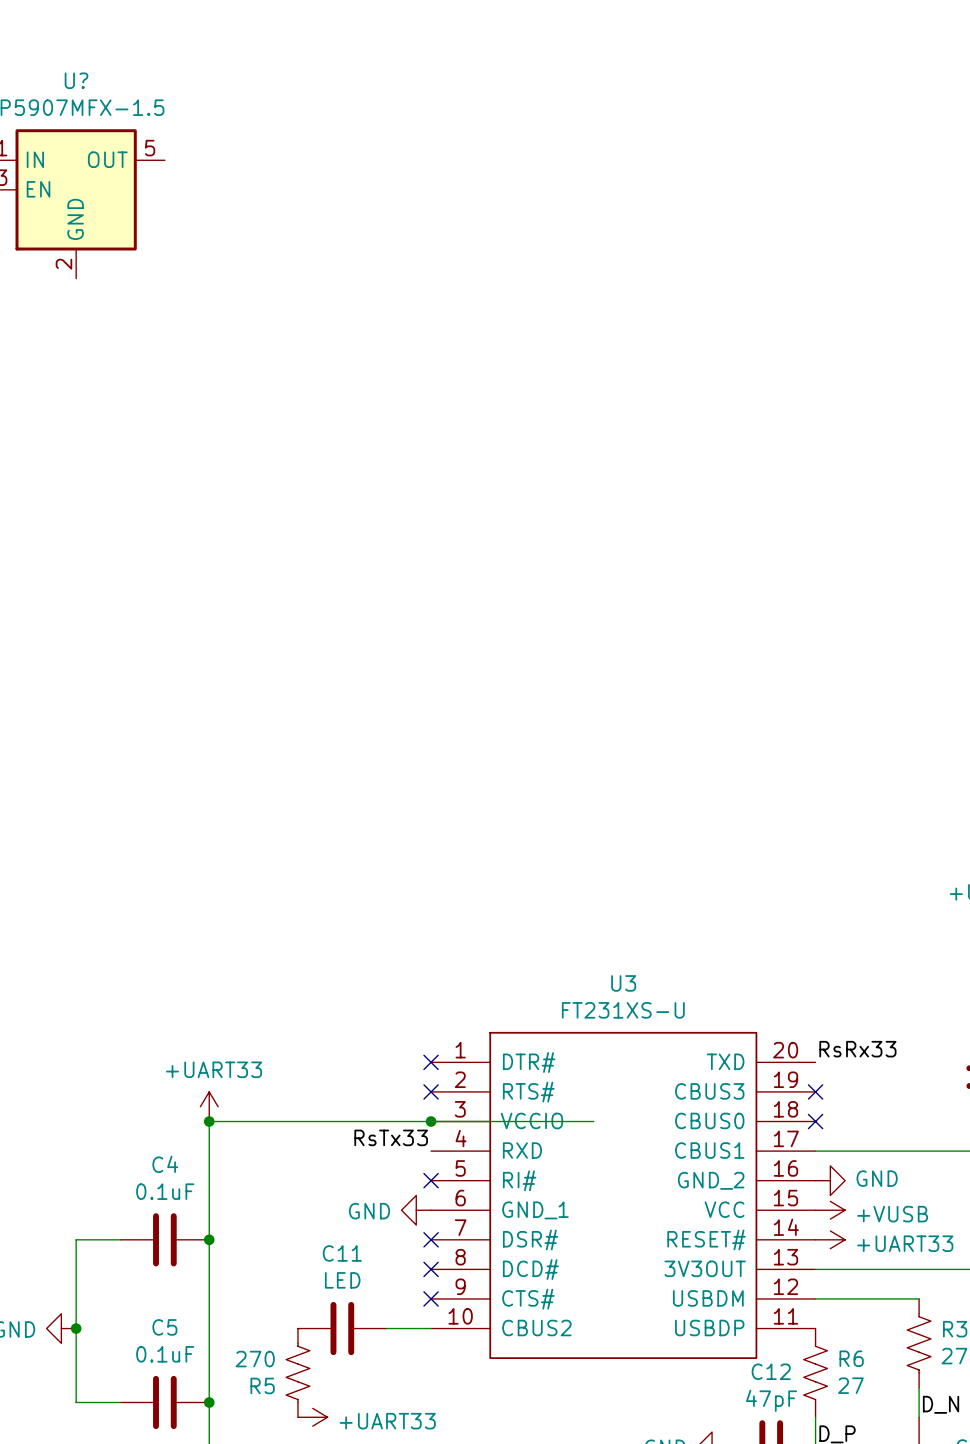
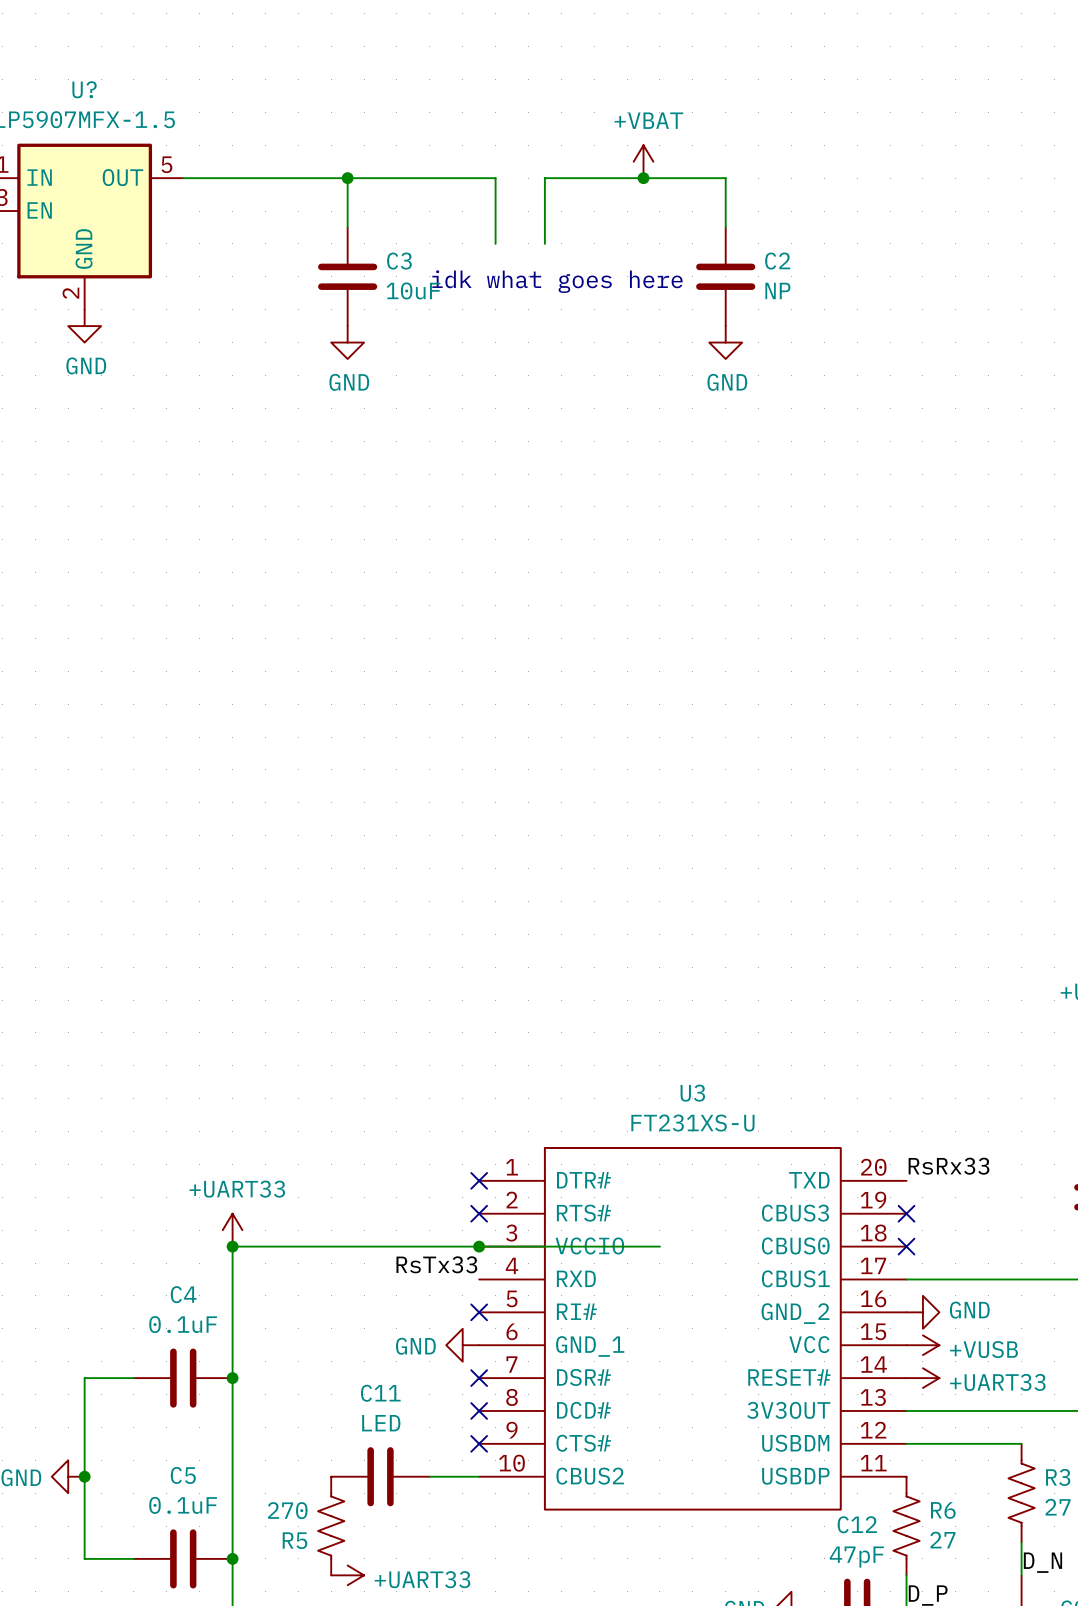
power symbol: none -> +VBAT (643, 161)
wire: none -> (183, 178) (495, 178) (495, 243)
wire: none -> (347, 178) (347, 227)
junction: none -> (347, 178)
junction: none -> (643, 178)
wire: none -> (725, 227) (725, 178) (544, 178) (544, 243)
C3: none -> 10uF (347, 276)
C2: none -> NP (725, 276)
text: none -> idk what goes here (557, 281)
power symbol: none -> GND (84, 326)
power symbol: none -> GND (347, 342)
power symbol: none -> GND (725, 342)

